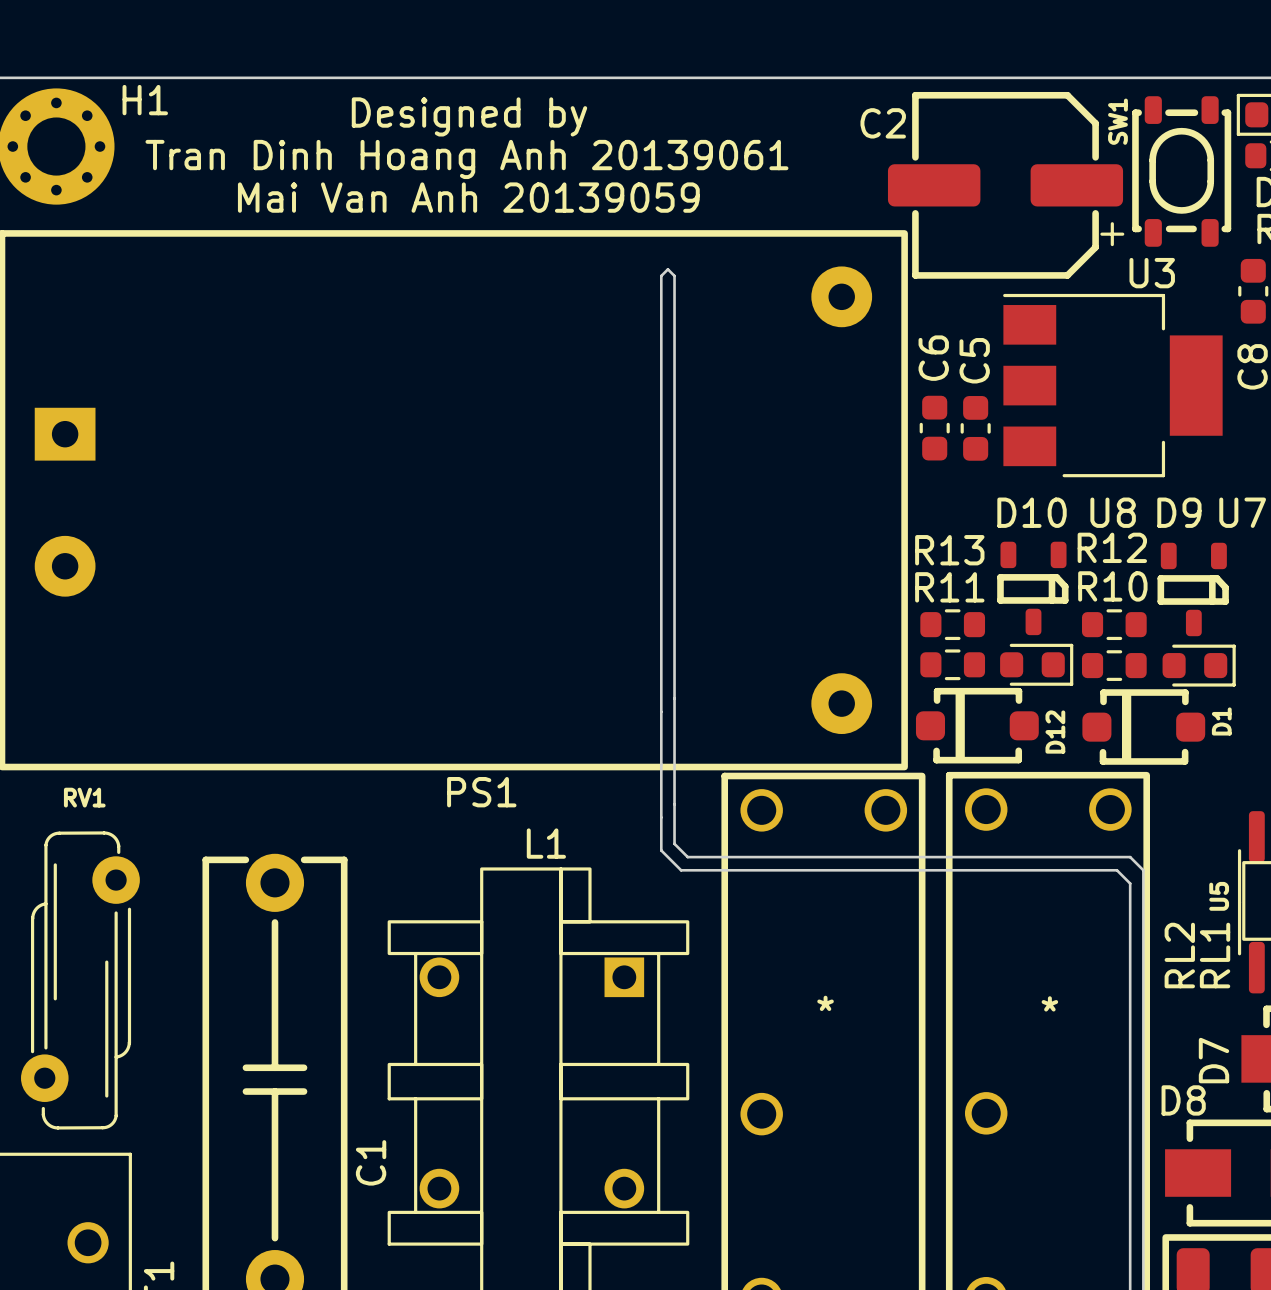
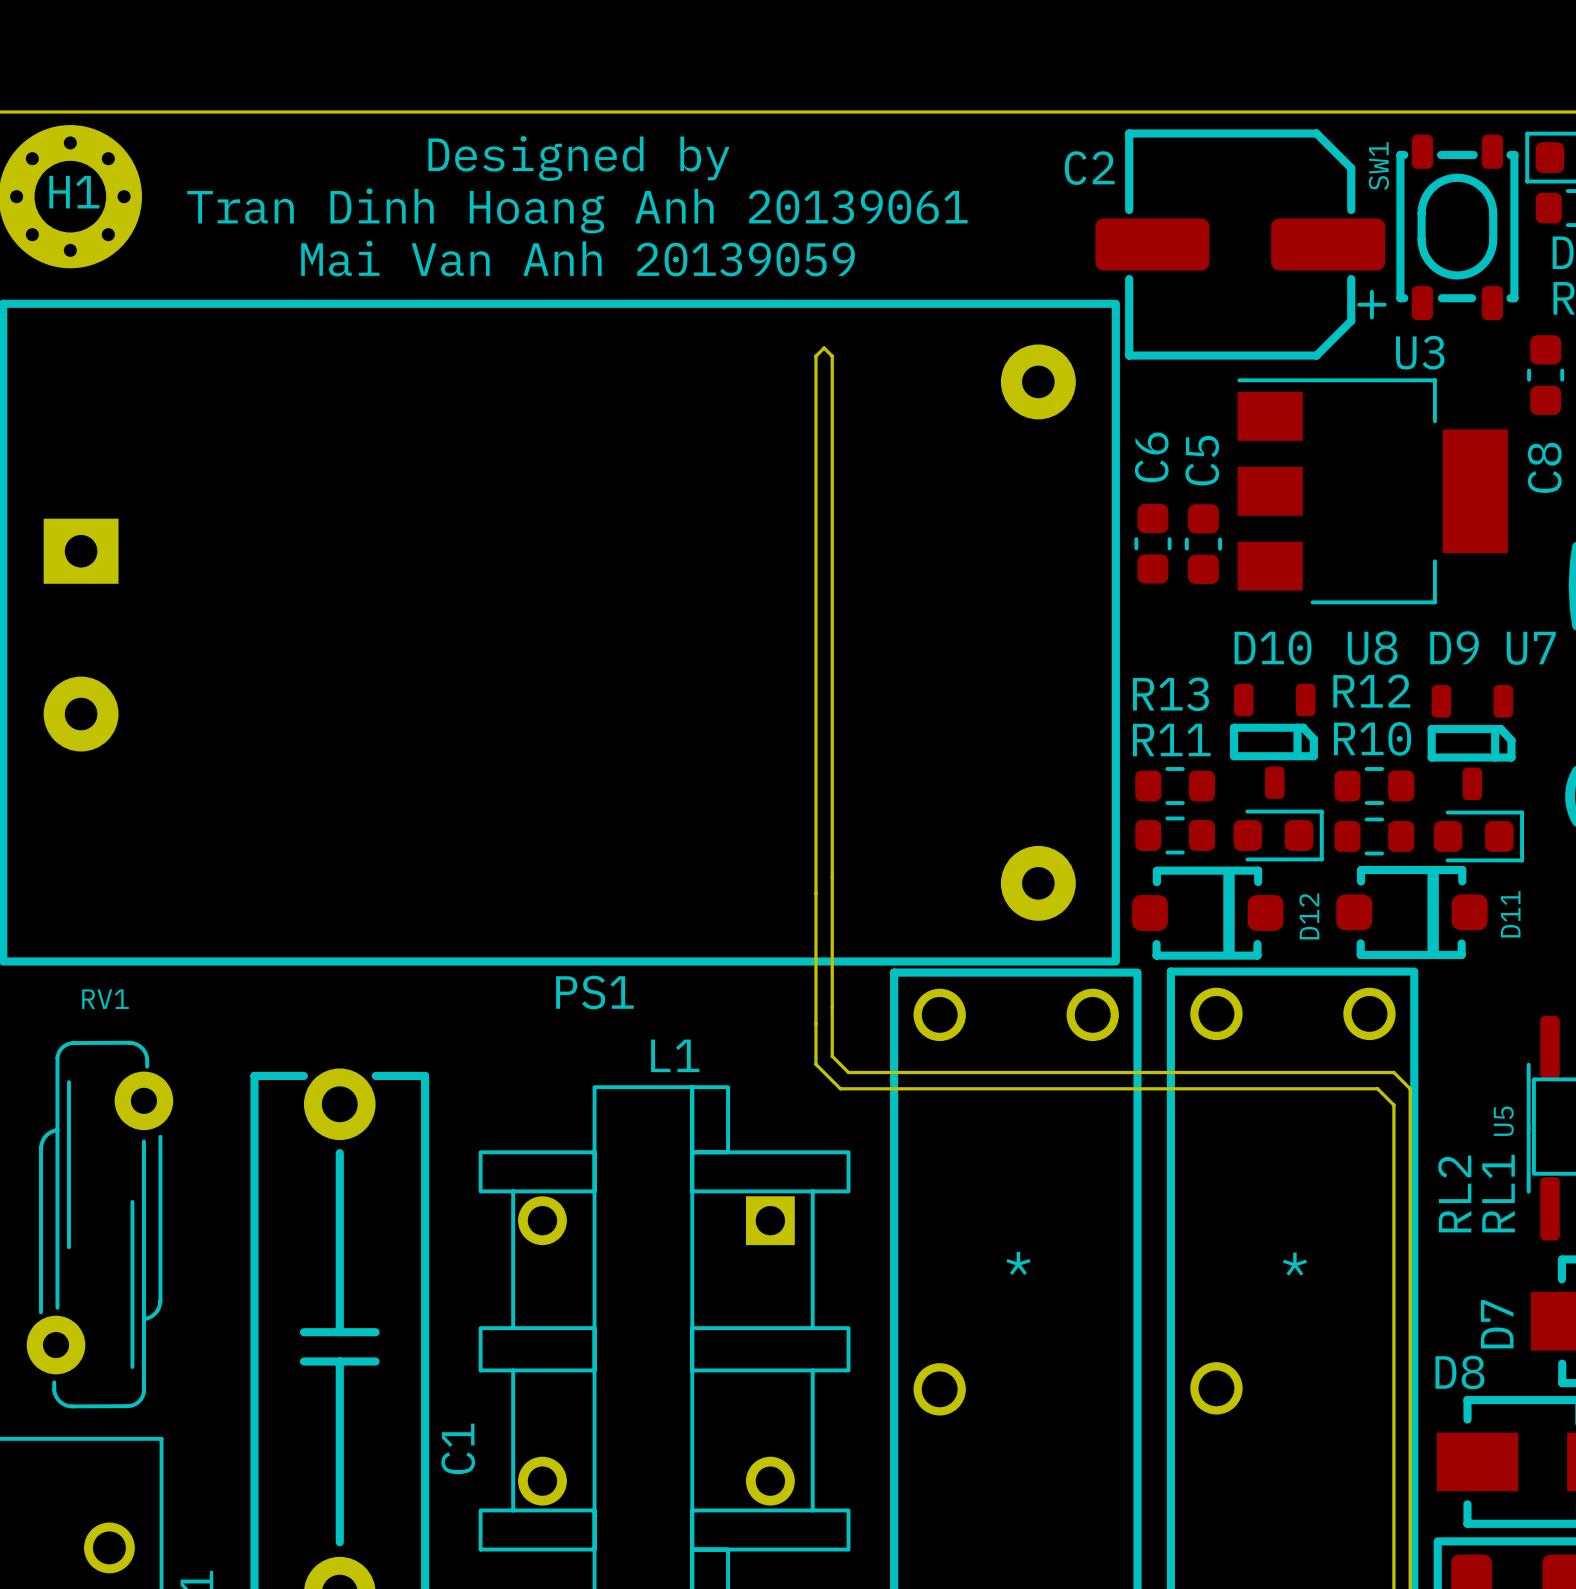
H1 name position: H1 (145, 100) -> H1 (74, 192)
D12 rotation: 0° (977, 725) -> 180° (1207, 913)
D1: (1143, 727) -> none
D11: none -> (1411, 912)

